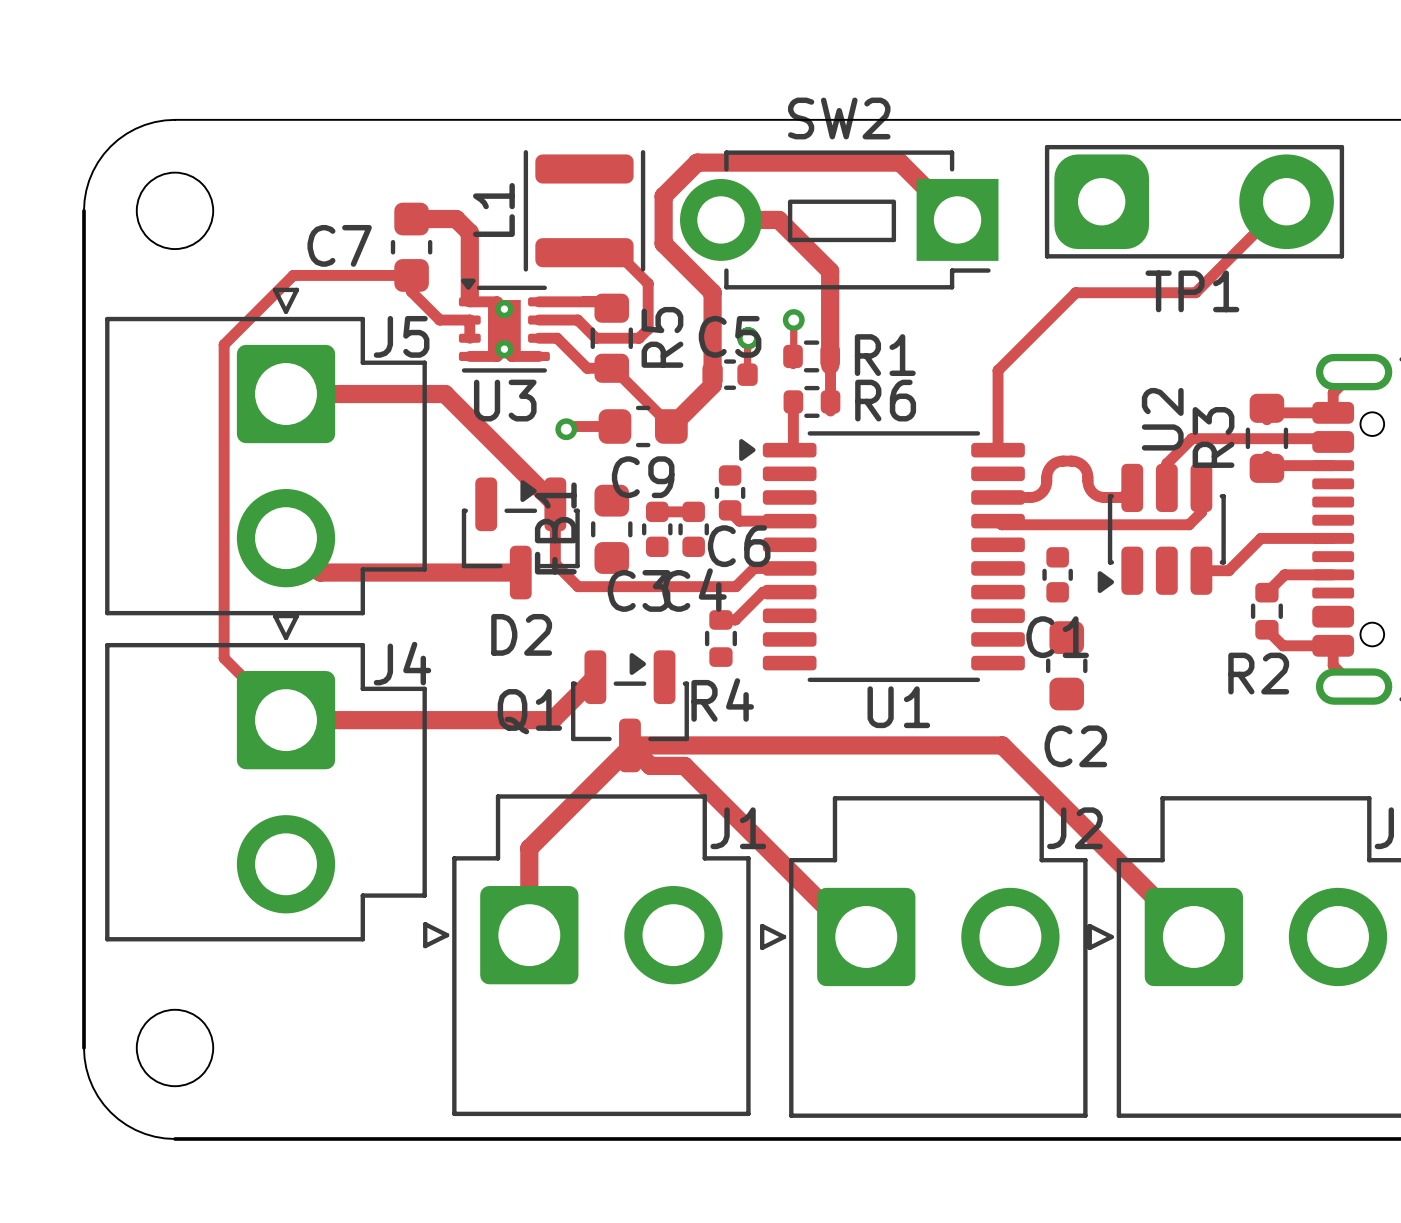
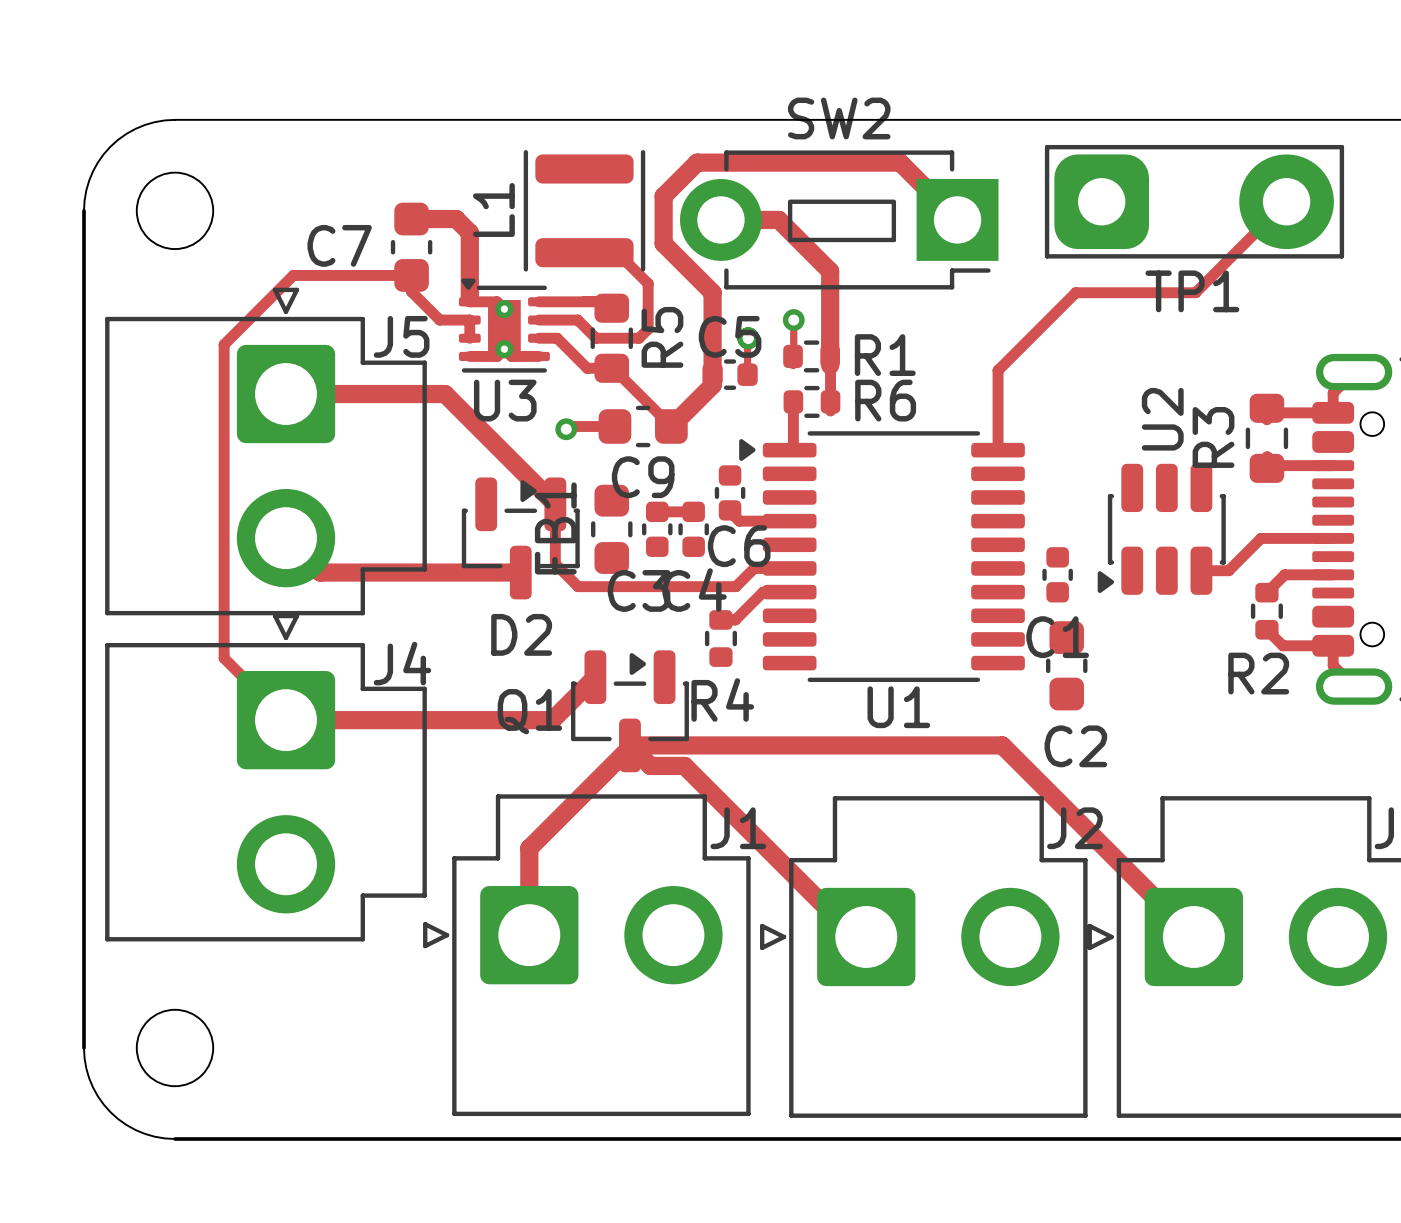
track: (1333, 441) (1329, 438) (1191, 438) (1166, 463) (1166, 487) -> none
track: (1132, 487) (1122, 497) (1098, 496) (1090, 489) (1087, 473) (1083, 465) (1075, 461) (1061, 461) (1053, 464) (1049, 469) (1045, 487) (1038, 495) (1030, 497) (998, 497) -> none
track: (1201, 487) (1201, 512) (1189, 524) (1001, 524) (998, 521) -> none

